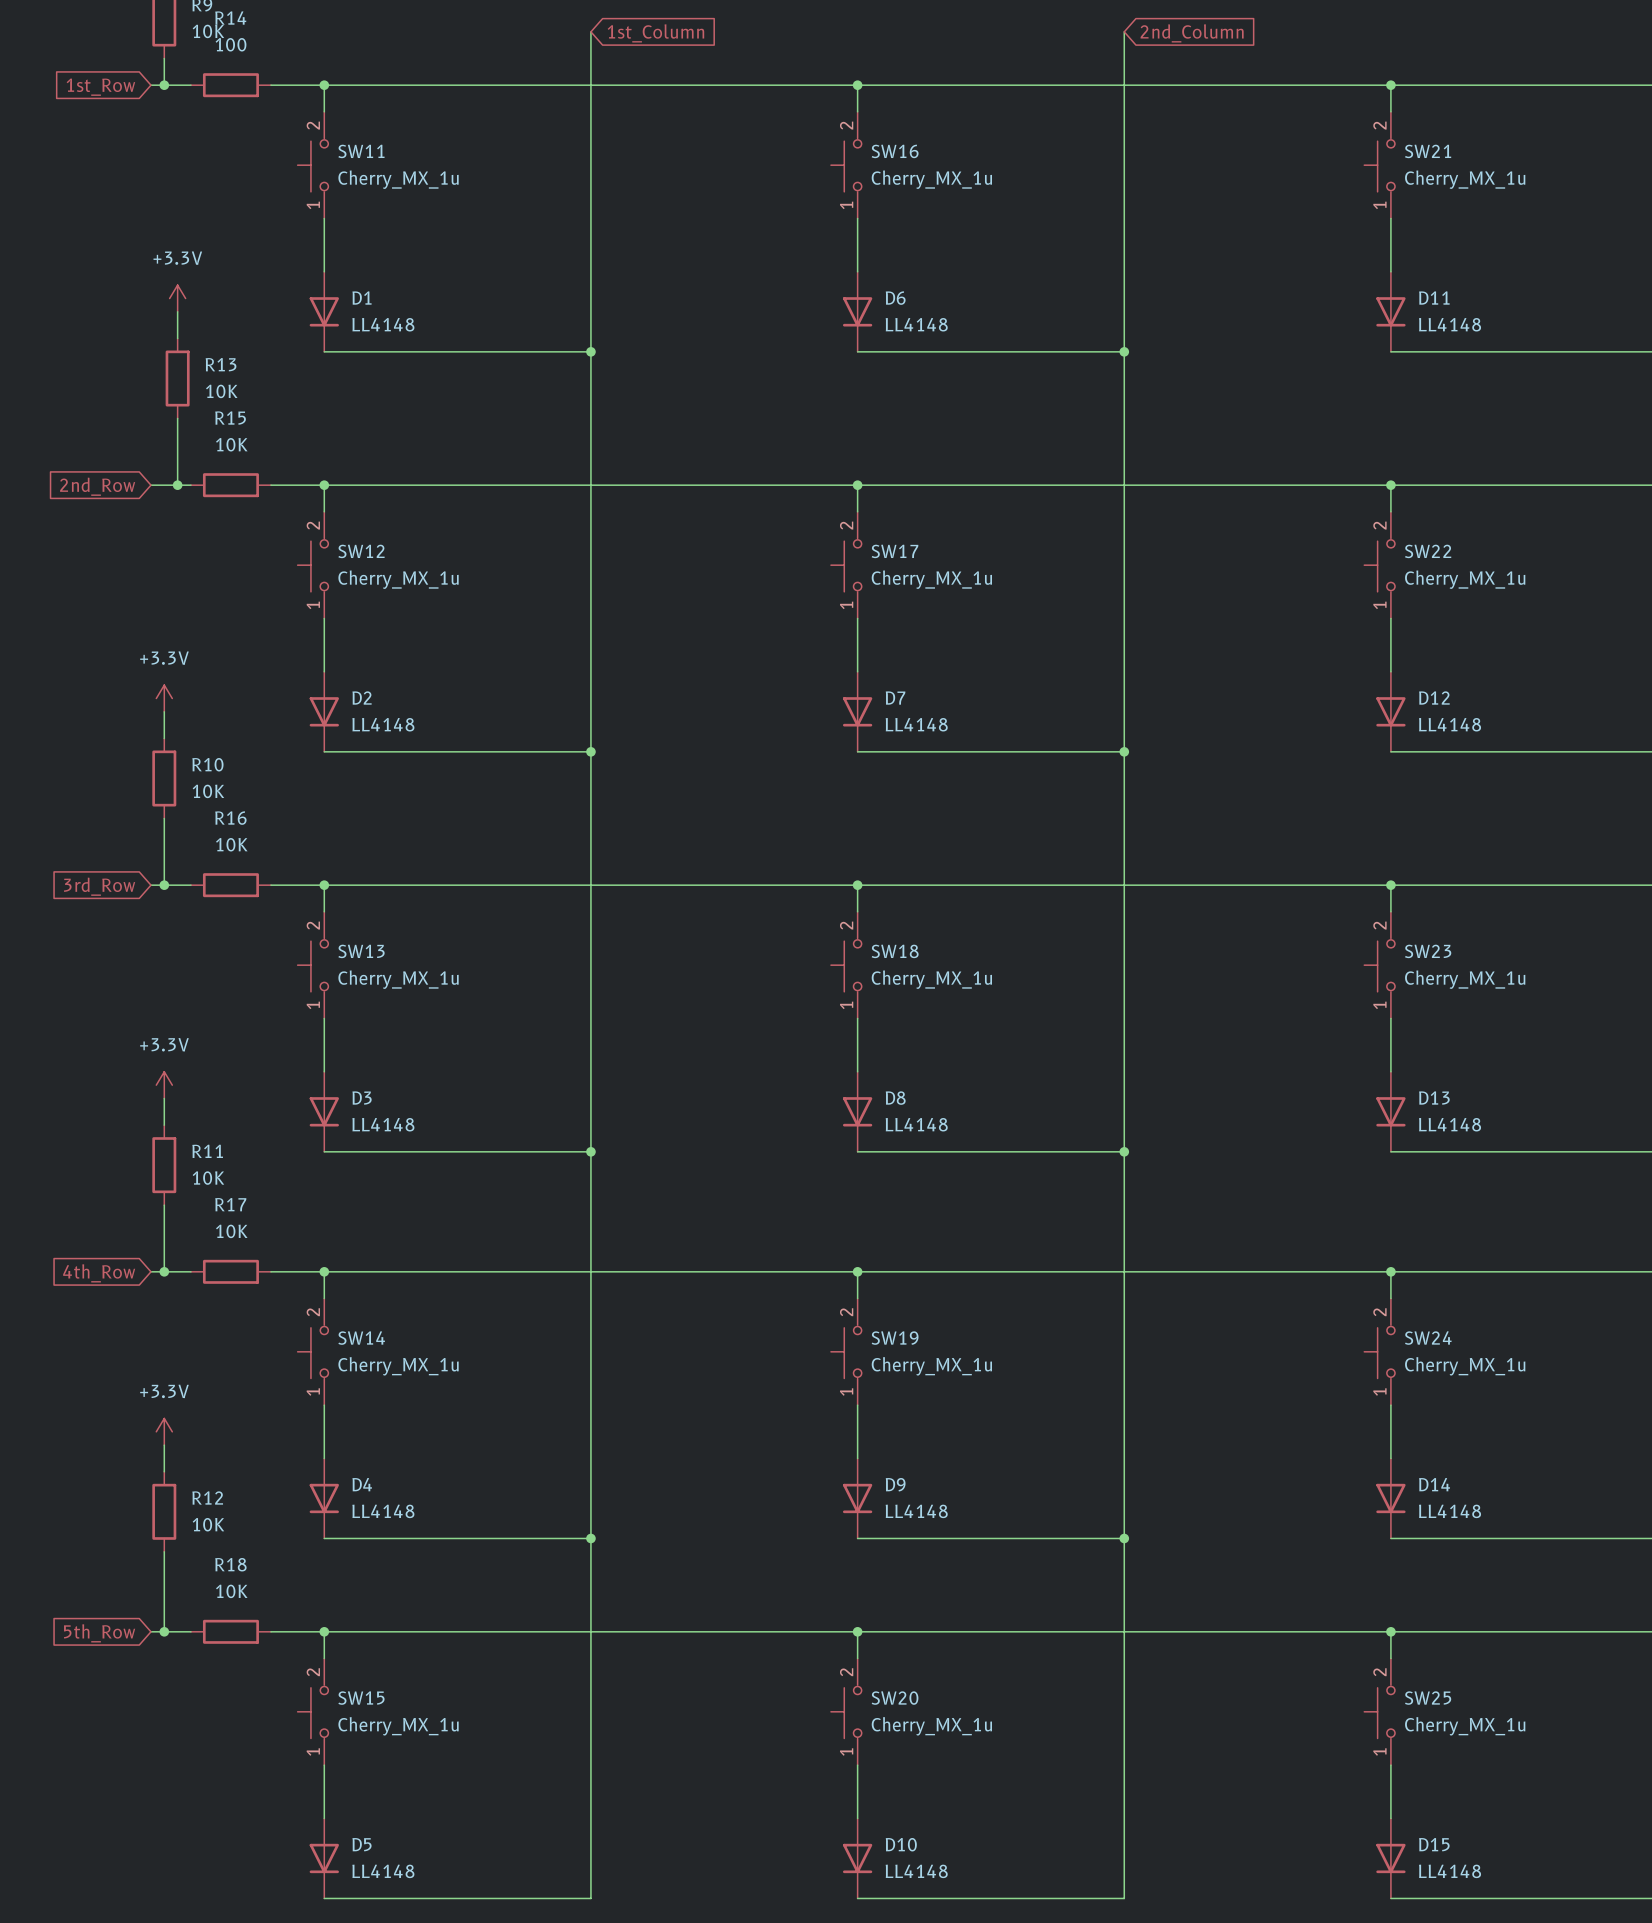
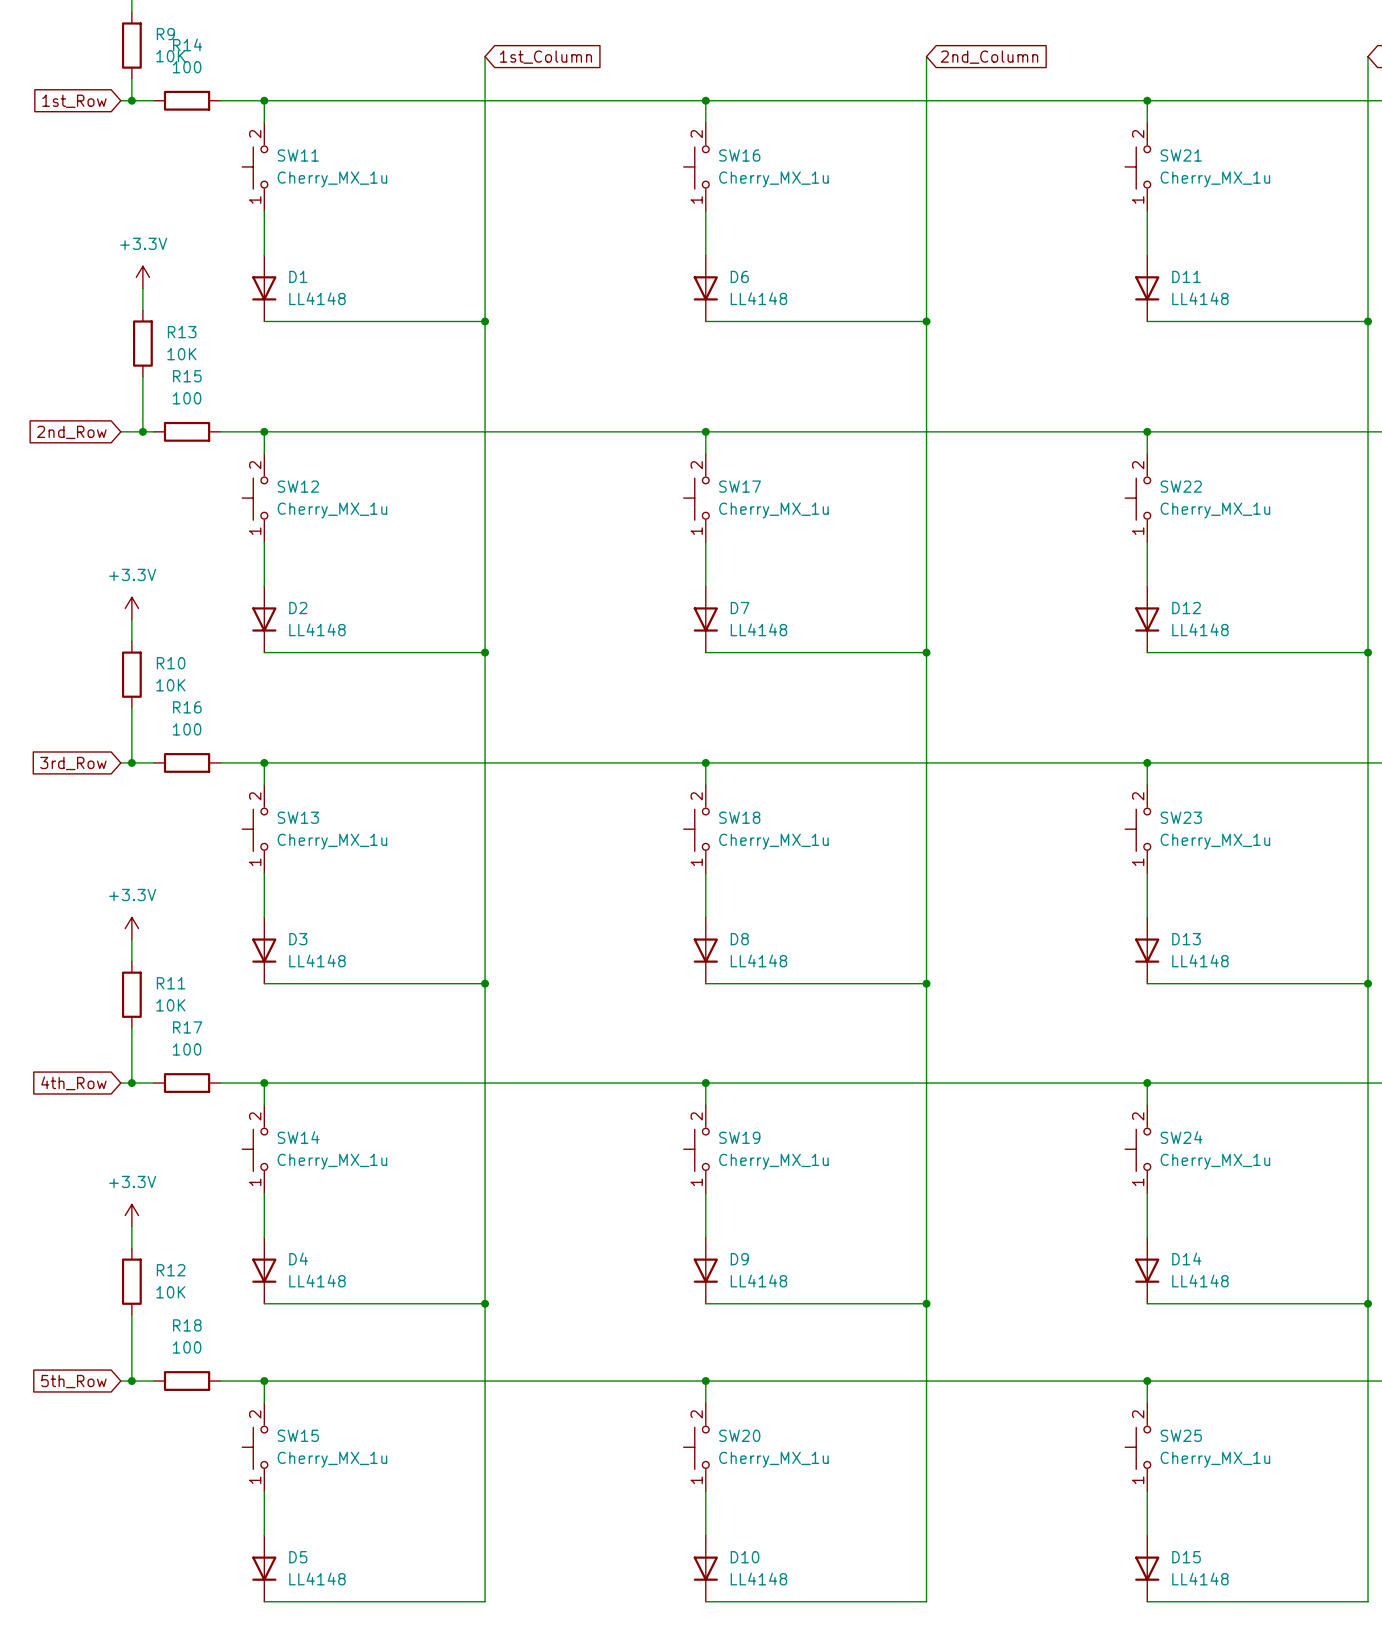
R15 value: 10K (231, 444) -> 100 (187, 398)
R16 value: 10K (231, 844) -> 100 (187, 729)
R17 value: 10K (231, 1231) -> 100 (187, 1049)
R18 value: 10K (231, 1591) -> 100 (187, 1347)

